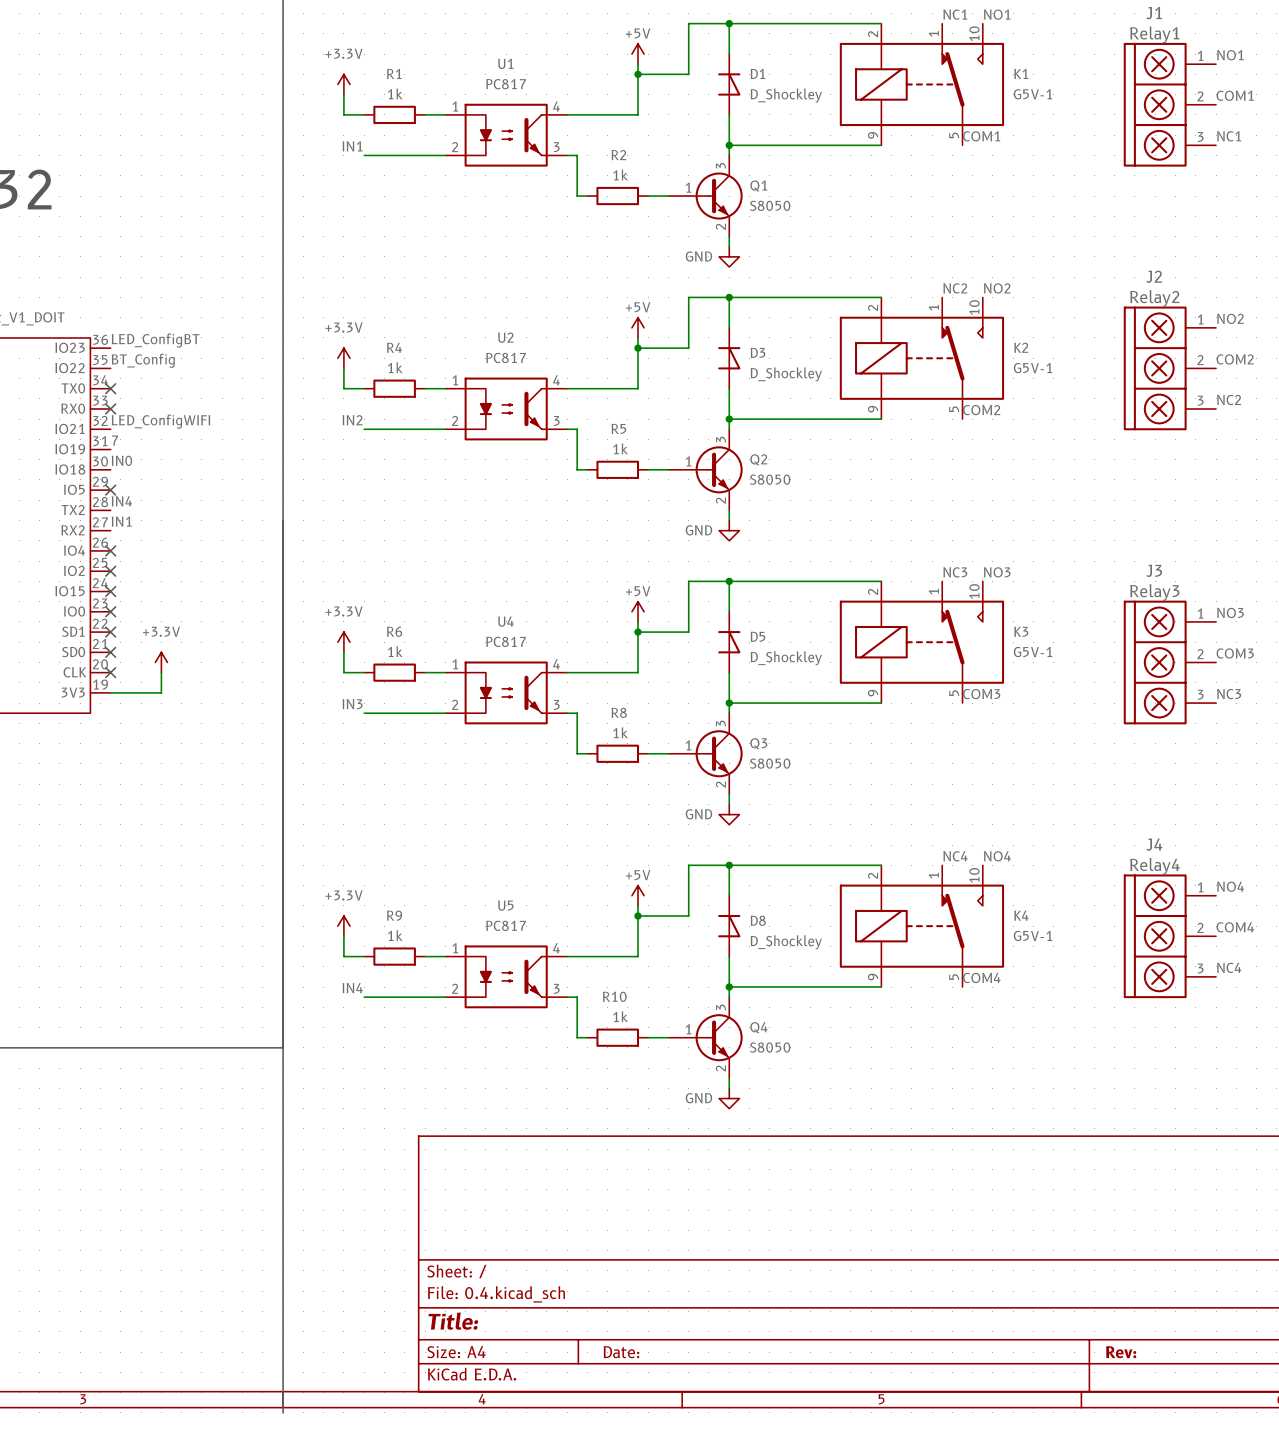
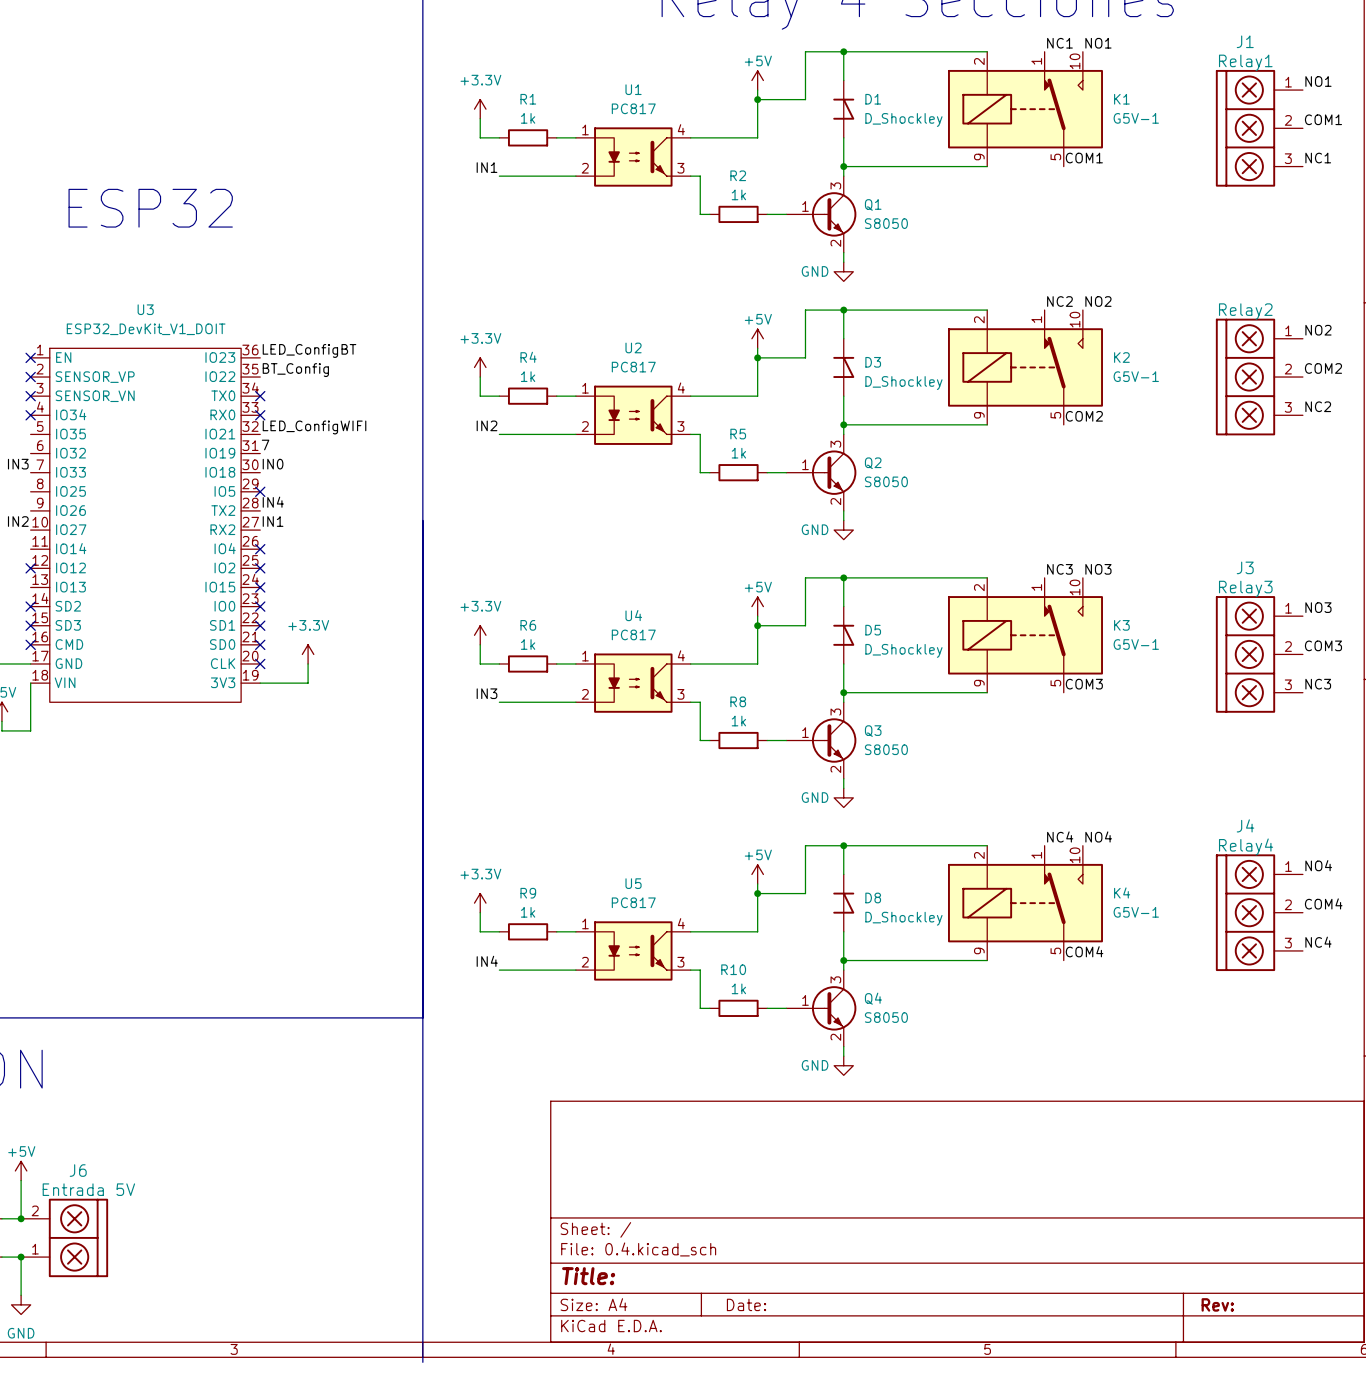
J2 name: J2 (1154, 276) -> none

